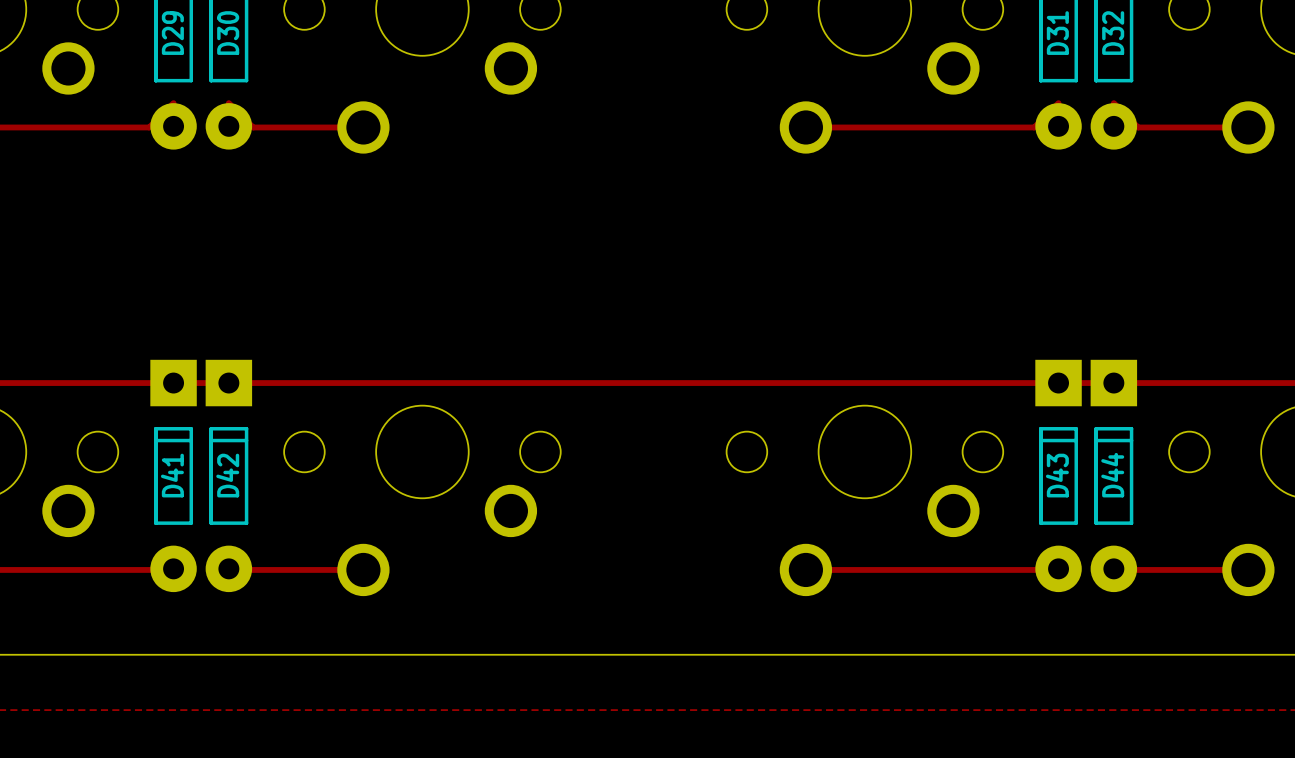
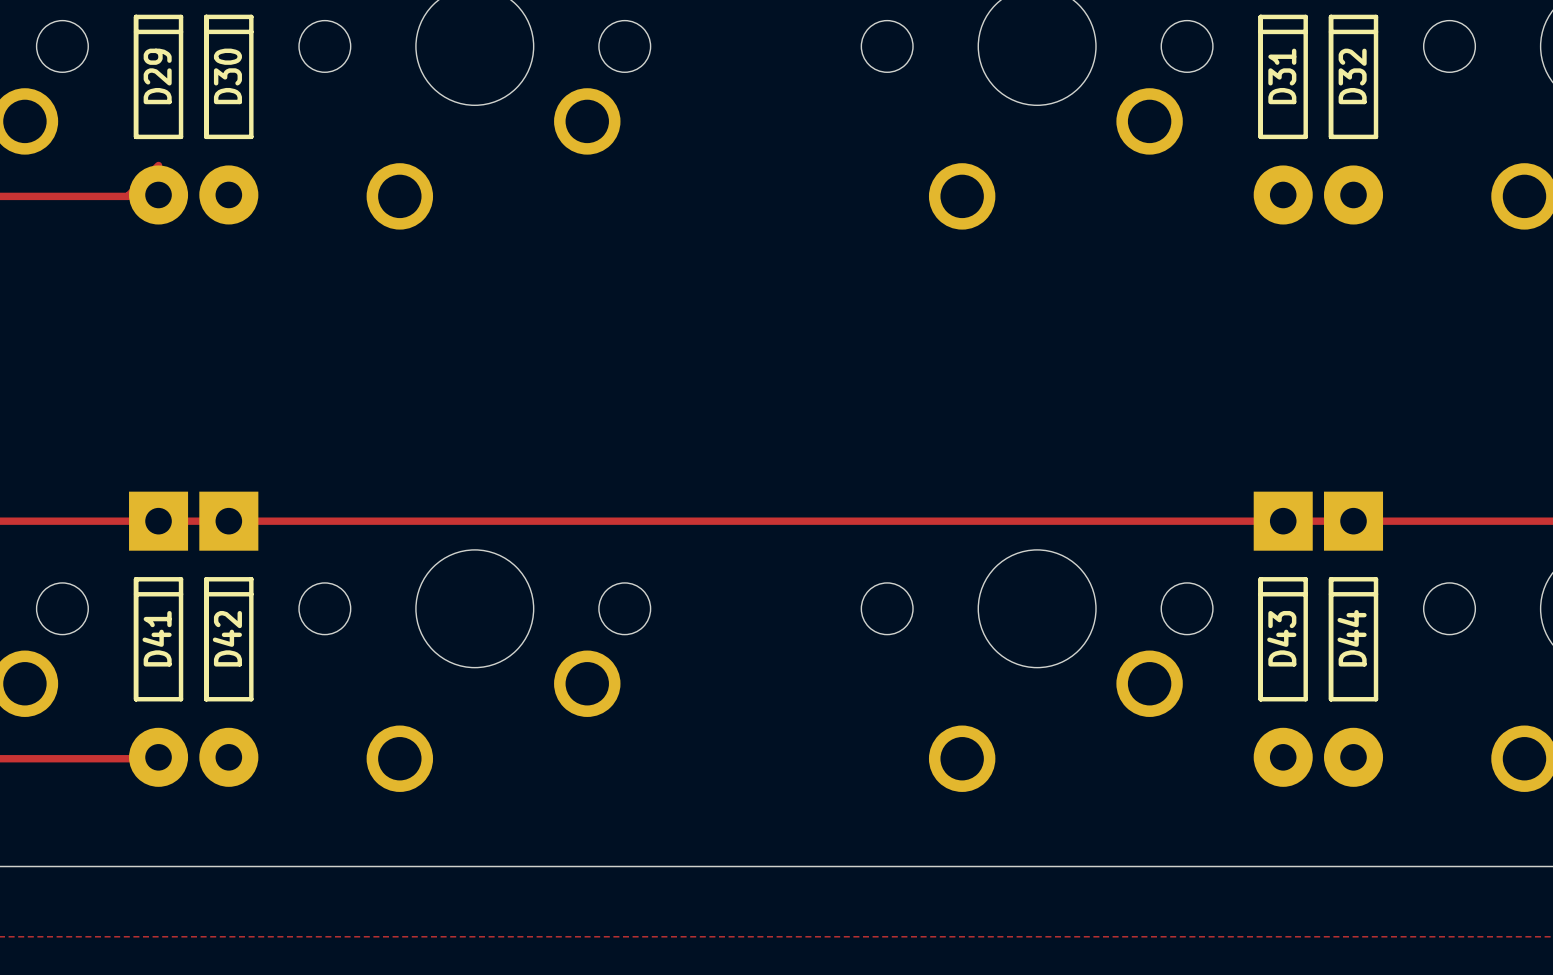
track: (228, 103) (253, 127) (363, 127) -> none
track: (1058, 103) (1034, 127) (805, 127) -> none
track: (1113, 103) (1138, 127) (1248, 127) -> none
track: (228, 568) (363, 569) -> none
track: (1058, 568) (805, 569) -> none
track: (1113, 568) (1248, 569) -> none

